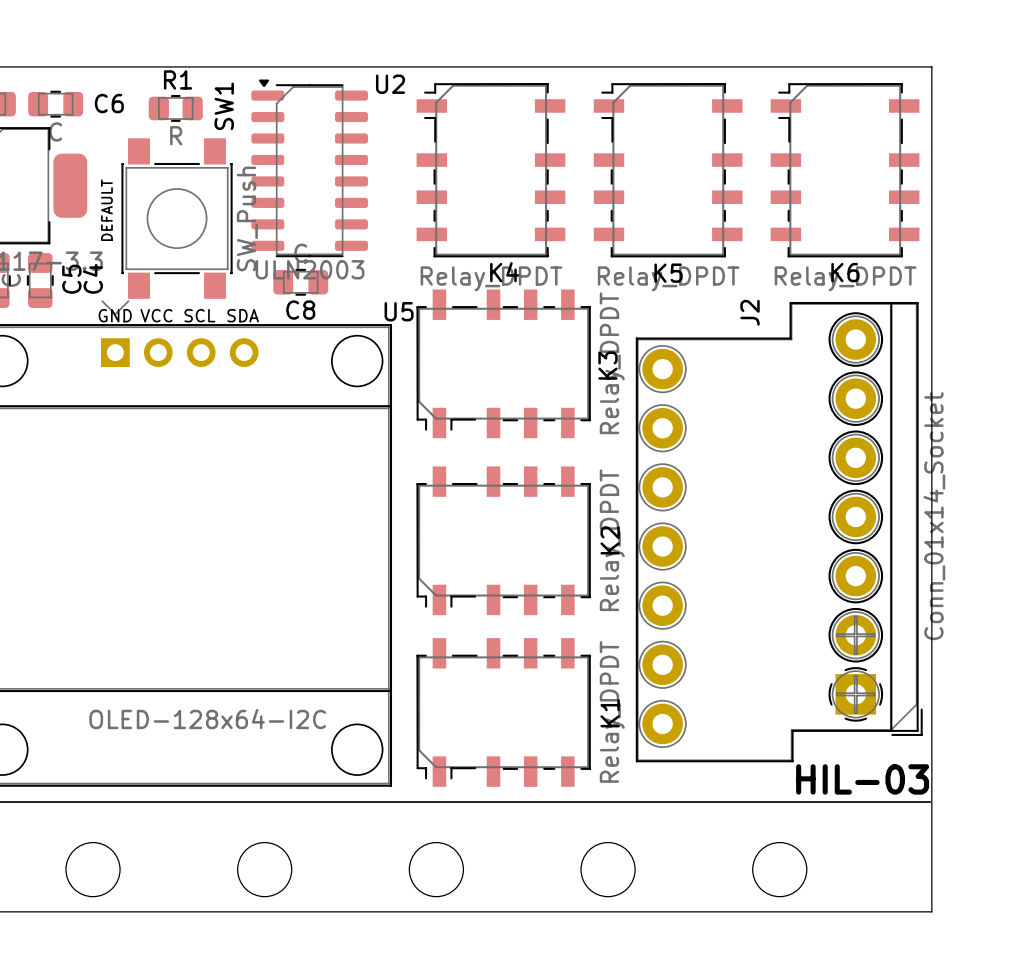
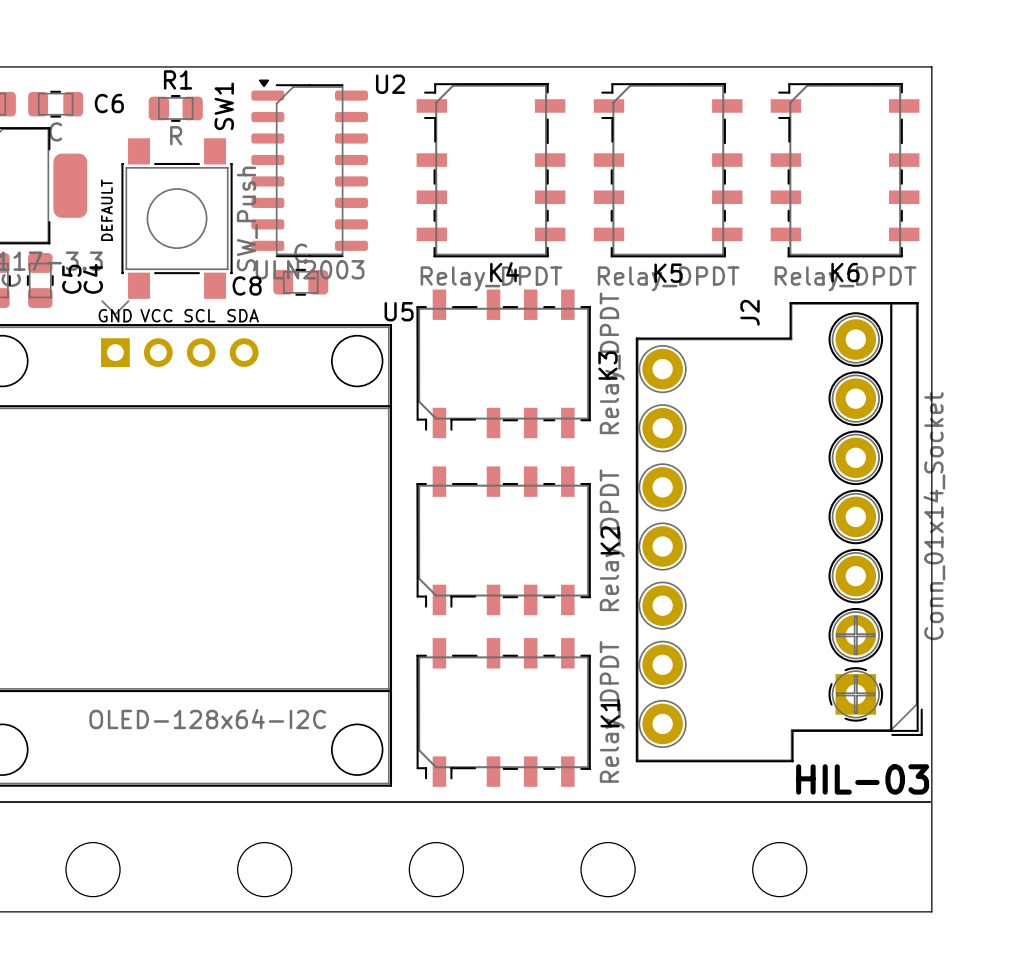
C8 name position: C8 (300, 310) -> C8 (247, 285)

